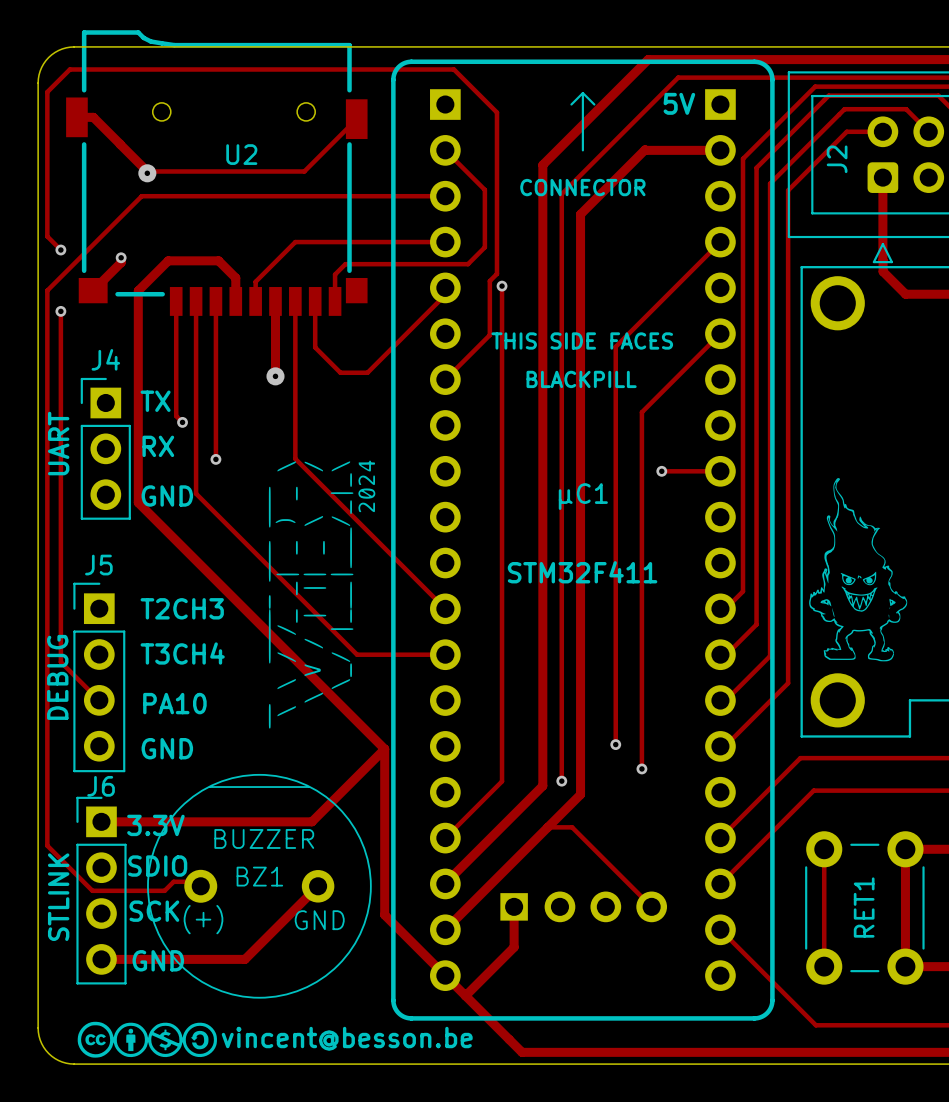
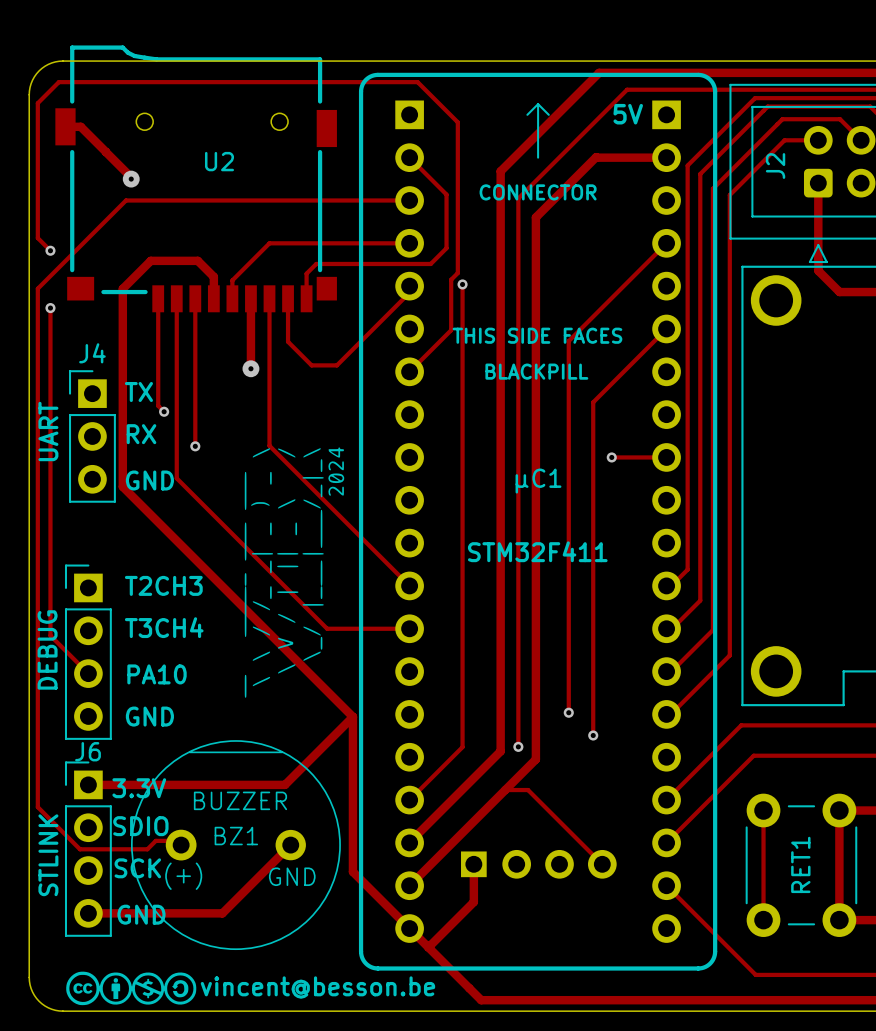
track: (356, 119) (304, 171) (147, 171) -> none
track: (121, 257) (121, 262) (93, 290) -> none
via: (121, 257) -> none
drawing: [809, 478, 908, 662] -> none
J5: (99, 677) -> none
part: none -> (88, 652)

